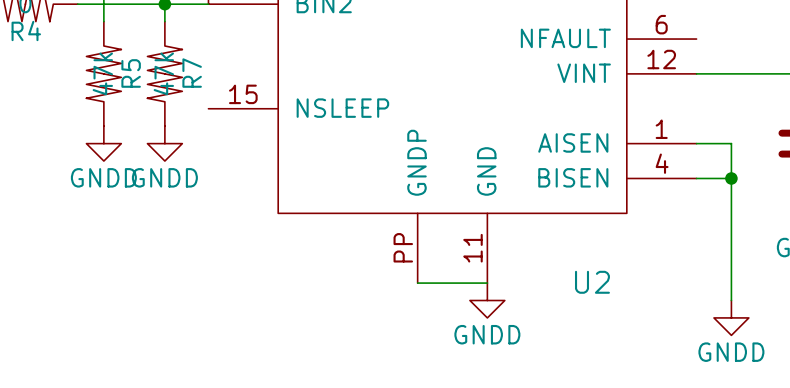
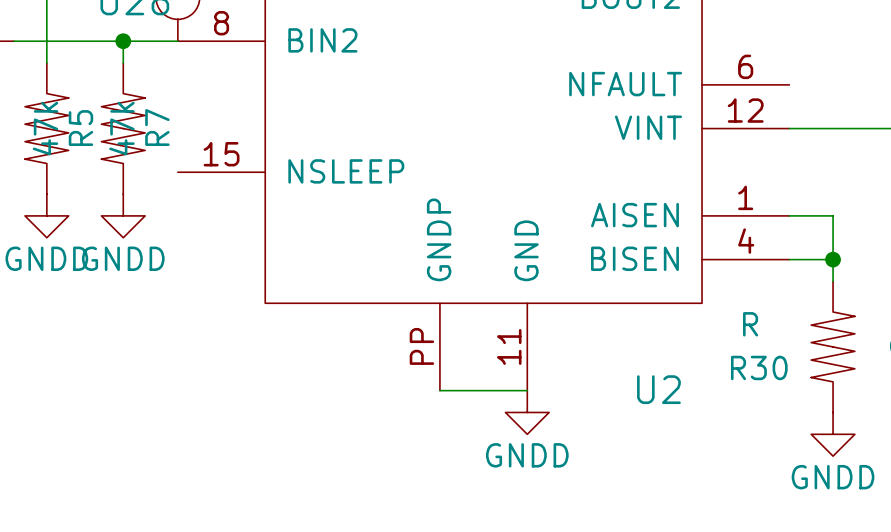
R30: none -> R (833, 346)

